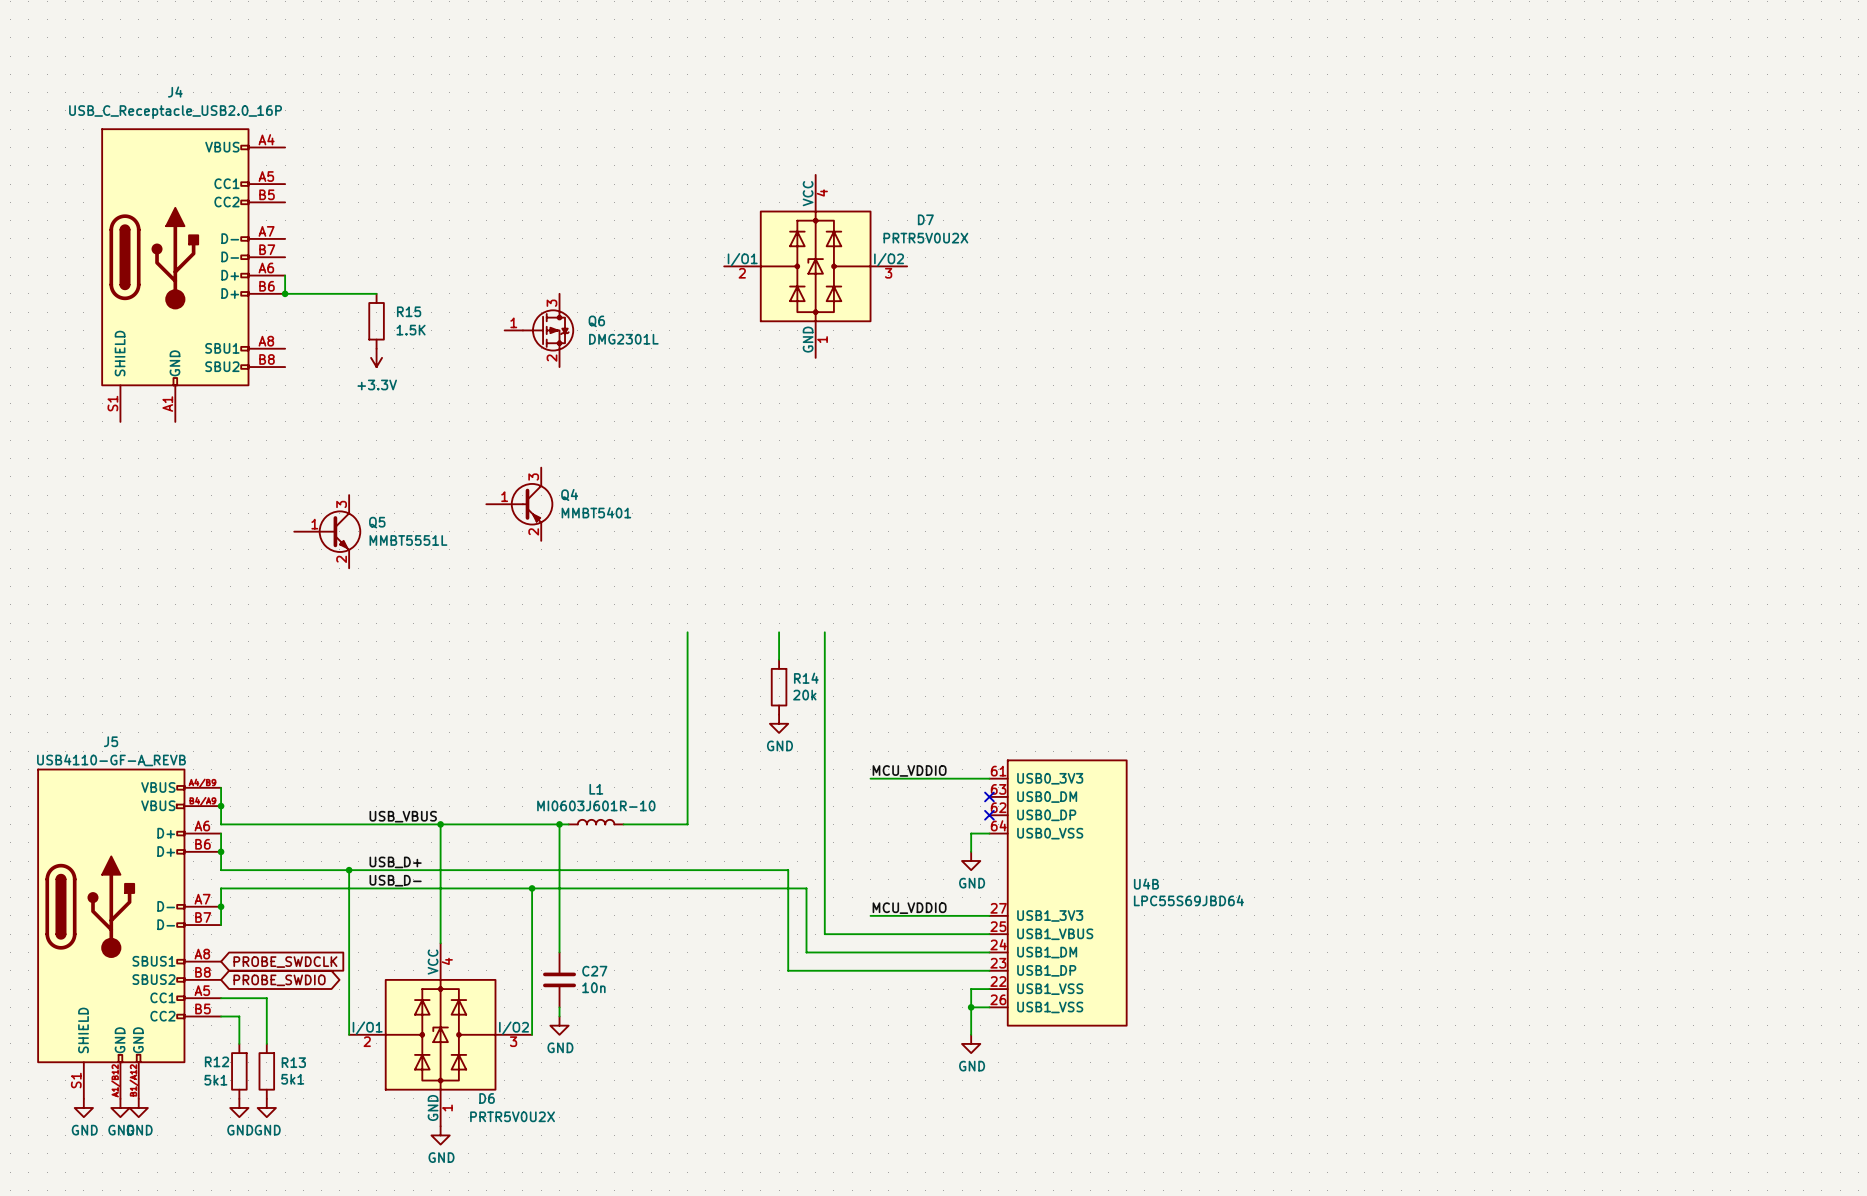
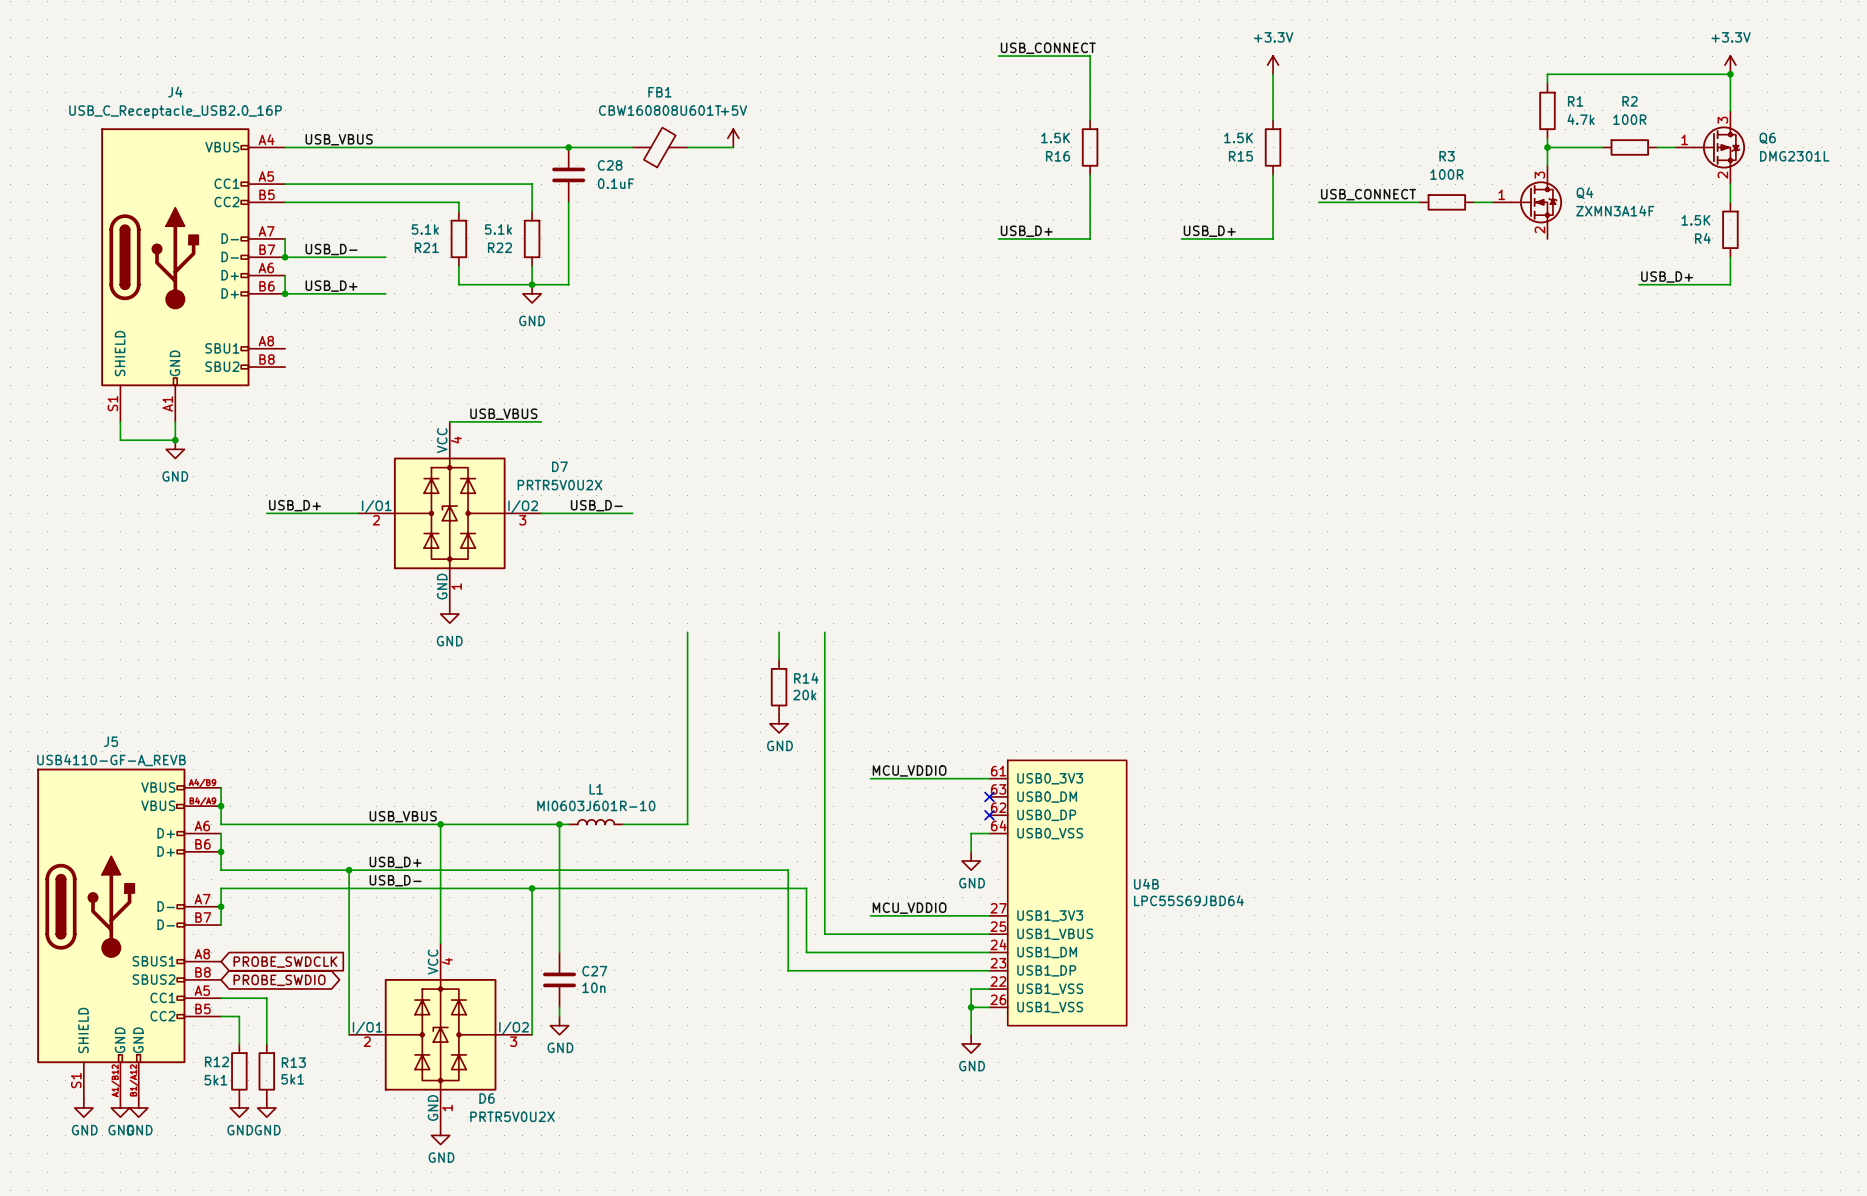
label: none -> USB_CONNECT (1048, 48)
wire: none -> (998, 56) (1090, 56) (1090, 120)
power symbol: none -> +3.3V (1273, 65)
power symbol: none -> +3.3V (1730, 65)
wire: none -> (1273, 74) (1273, 120)
junction: none -> (1730, 74)
wire: none -> (1547, 83) (1547, 74) (1730, 74) (1730, 110)
R1: none -> 4.7k (1547, 110)
power symbol: none -> +5V (733, 138)
wire: none -> (1547, 138) (1547, 165)
label: none -> USB_VBUS (339, 139)
wire: none -> (285, 147) (632, 147)
junction: none -> (568, 147)
FB1: none -> CBW160808U601T (660, 147)
wire: none -> (687, 147) (733, 147)
R16: none -> 1.5K (1090, 147)
wire: none -> (1547, 147) (1602, 147)
junction: none -> (1547, 147)
R2: none -> 100R (1629, 147)
wire: none -> (1657, 147) (1675, 147)
C28: none -> 0.1uF (568, 174)
wire: none -> (1090, 174) (1090, 238) (998, 238)
wire: none -> (1273, 174) (1273, 238) (1181, 238)
wire: none -> (285, 184) (532, 184) (532, 211)
wire: none -> (1730, 184) (1730, 202)
label: none -> USB_CONNECT (1368, 194)
wire: none -> (285, 202) (458, 202) (458, 211)
wire: none -> (568, 202) (568, 284) (458, 284) (458, 266)
wire: none -> (1318, 202) (1419, 202)
R3: none -> 100R (1446, 202)
wire: none -> (1474, 202) (1492, 202)
R4: none -> 1.5K (1730, 229)
label: none -> USB_D+ (1026, 231)
label: none -> USB_D+ (1209, 231)
wire: none -> (285, 238) (285, 257) (385, 257)
R21: none -> 5.1k (458, 238)
R22: none -> 5.1k (532, 238)
label: none -> USB_D- (331, 249)
junction: none -> (285, 257)
wire: none -> (1730, 257) (1730, 284) (1638, 284)
wire: none -> (532, 266) (532, 284)
D7 position: (815, 266) -> (449, 513)
label: none -> USB_D+ (1667, 276)
junction: none -> (532, 284)
label: none -> USB_D+ (331, 286)
wire: none -> (376, 293) (385, 293)
power symbol: none -> GND (532, 293)
R15 name position: R15 (409, 311) -> R15 (1240, 156)
R15 position: (376, 321) -> (1273, 147)
R15 value position: 1.5K (411, 330) -> 1.5K (1238, 137)
Q6 position: (539, 330) -> (1710, 147)
power symbol: +3.3V (376, 357) -> none
label: none -> USB_VBUS (503, 414)
wire: none -> (120, 421) (120, 440) (175, 440) (175, 421)
wire: none -> (449, 421) (541, 421)
junction: none -> (175, 440)
power symbol: none -> GND (175, 449)
Q4 symbol: [486, 467, 554, 541] -> [1492, 165, 1563, 239]
label: none -> USB_D+ (294, 505)
label: none -> USB_D- (596, 505)
Q4 value: MMBT5401 (596, 512) -> ZXMN3A14F (1615, 210)
wire: none -> (266, 513) (358, 513)
wire: none -> (541, 513) (632, 513)
Q5: MMBT5551L (327, 531) -> none
power symbol: none -> GND (449, 614)

